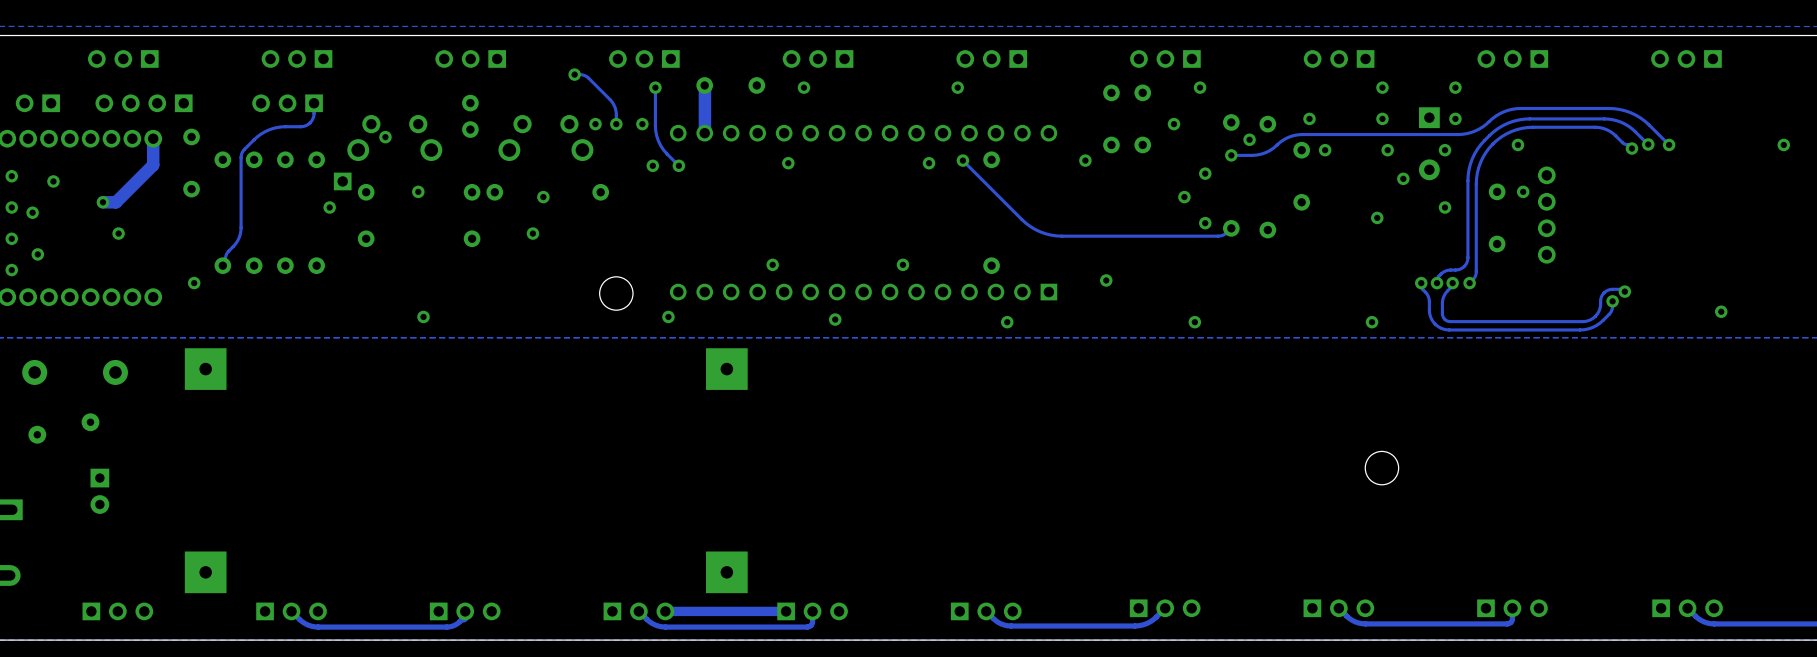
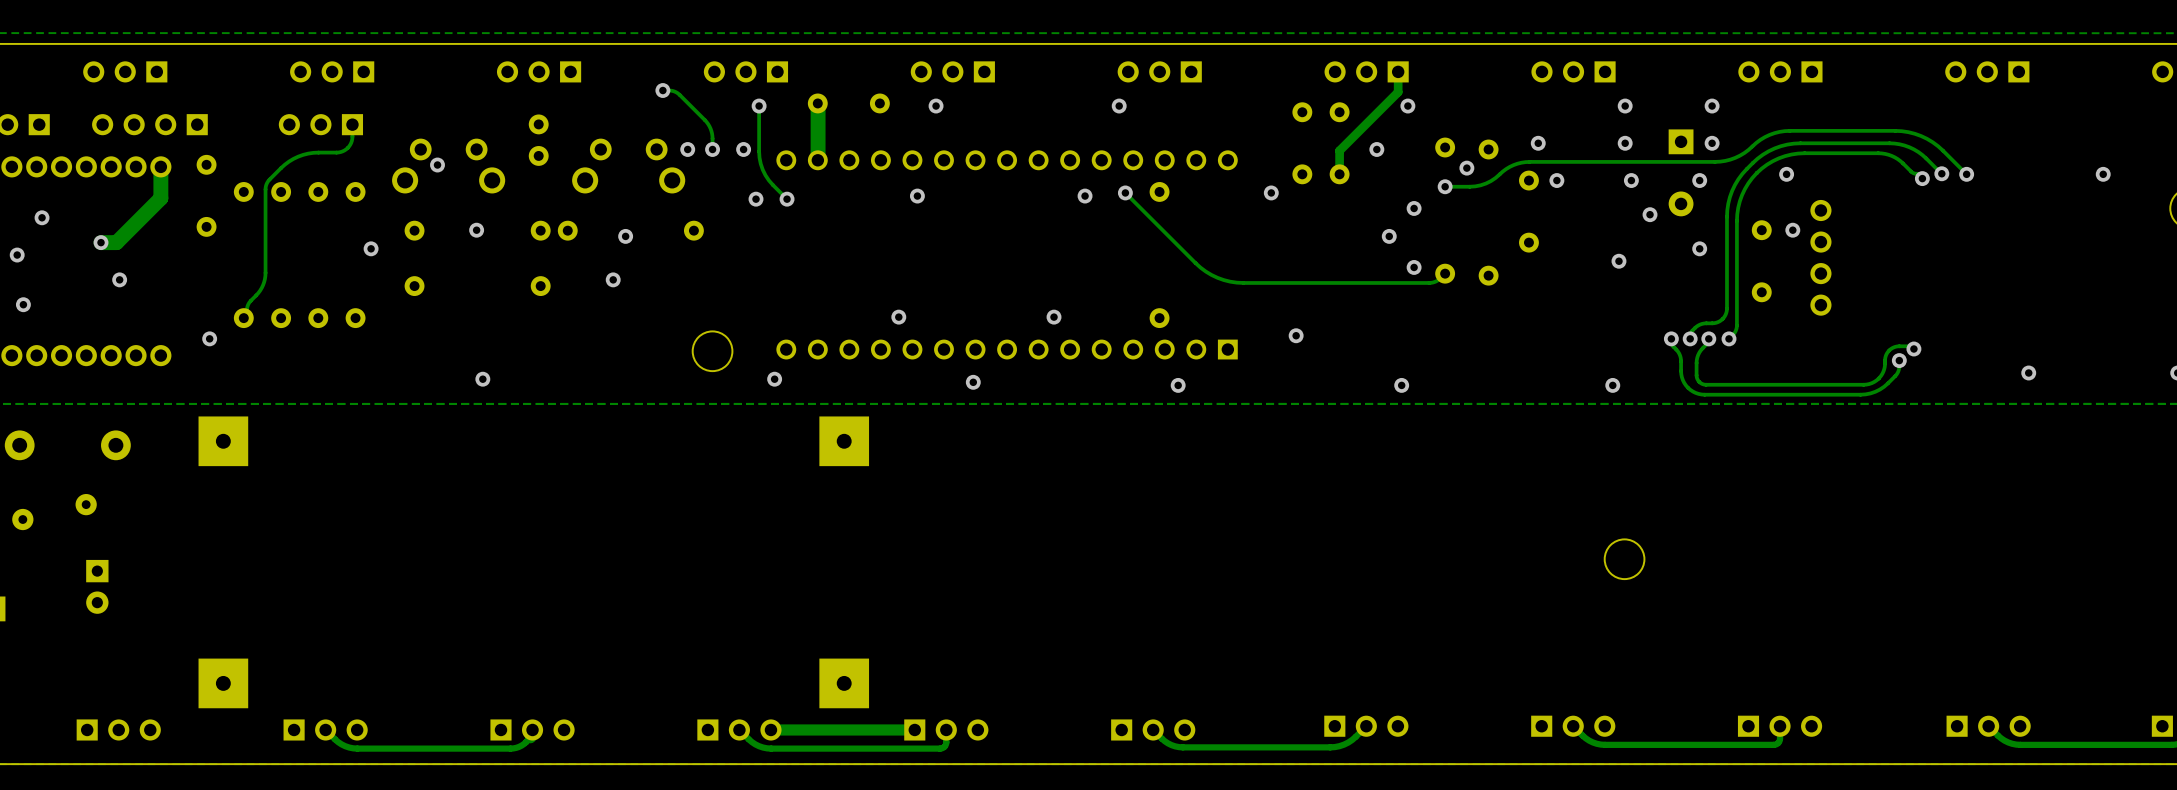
track: none -> (1398, 71) (1398, 92) (1339, 150) (1339, 174)
part: (342, 181) -> none

